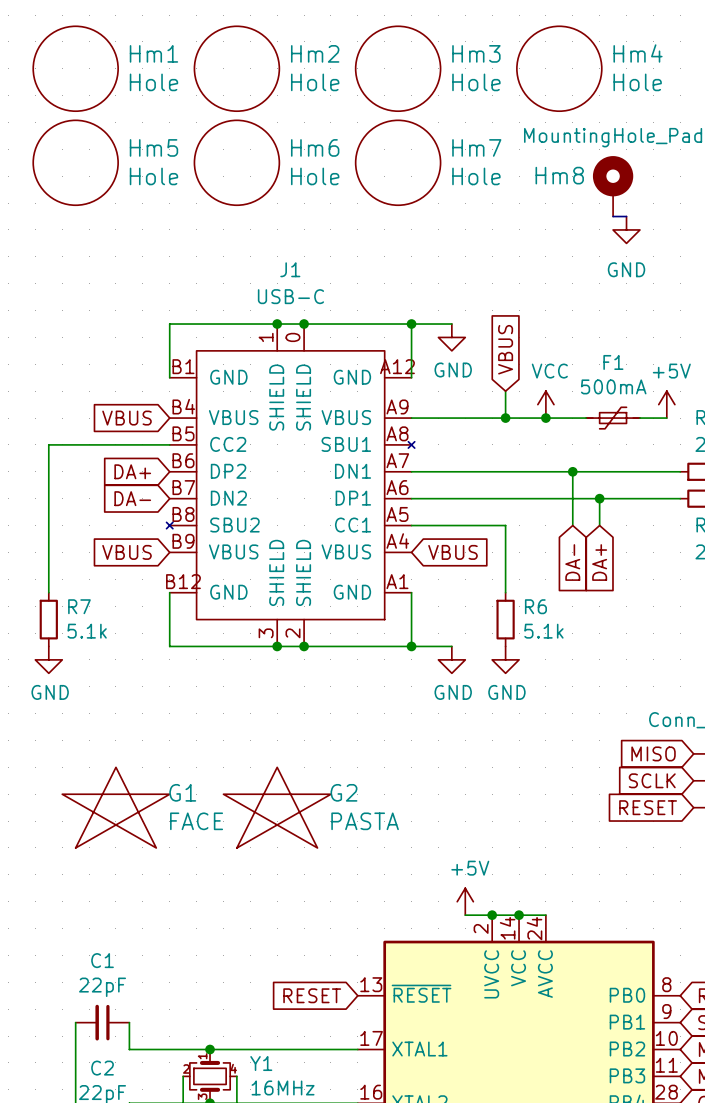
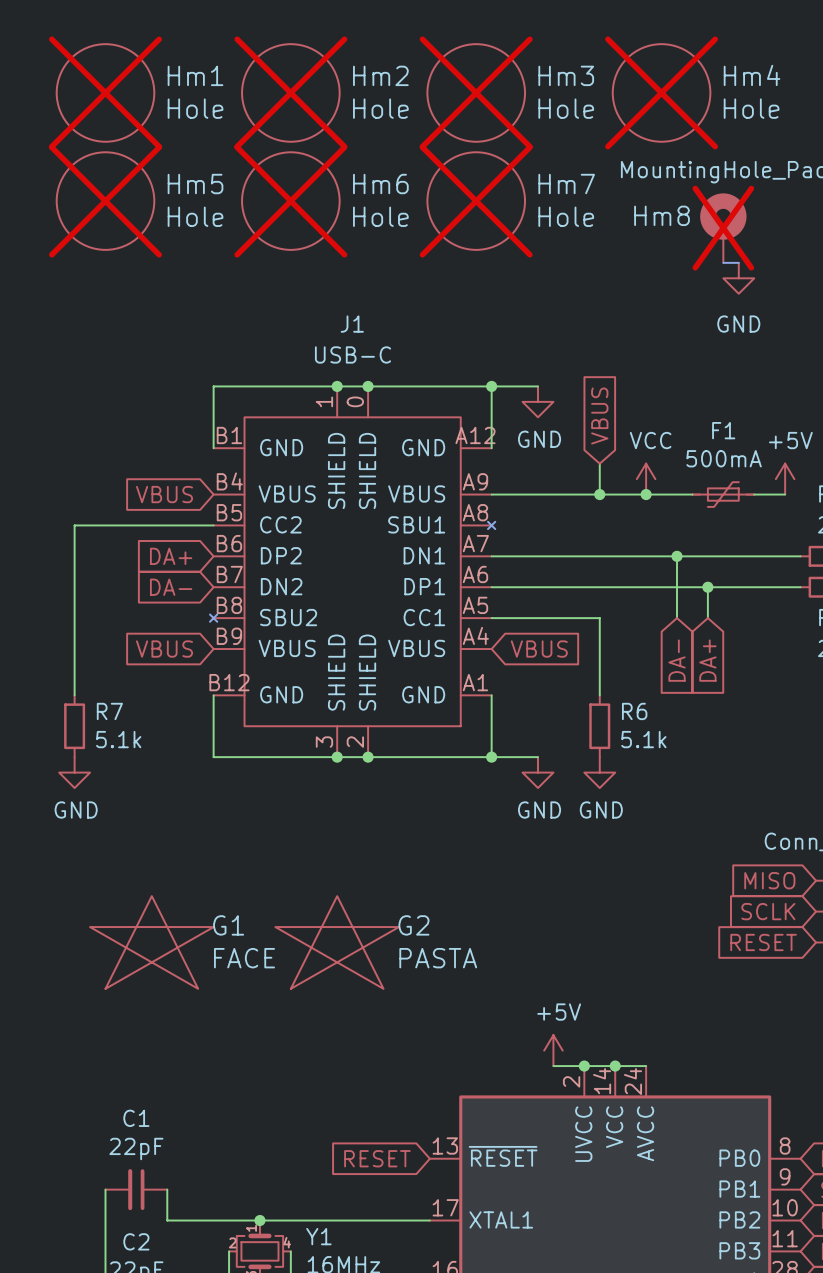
Hm1 do-not-place cross: none -> (105, 92)
Hm2 do-not-place cross: none -> (290, 92)
Hm3 do-not-place cross: none -> (476, 92)
Hm4 do-not-place cross: none -> (661, 92)
Hm5 do-not-place cross: none -> (105, 201)
Hm6 do-not-place cross: none -> (290, 201)
Hm7 do-not-place cross: none -> (476, 201)
Hm8 do-not-place cross: none -> (723, 228)

